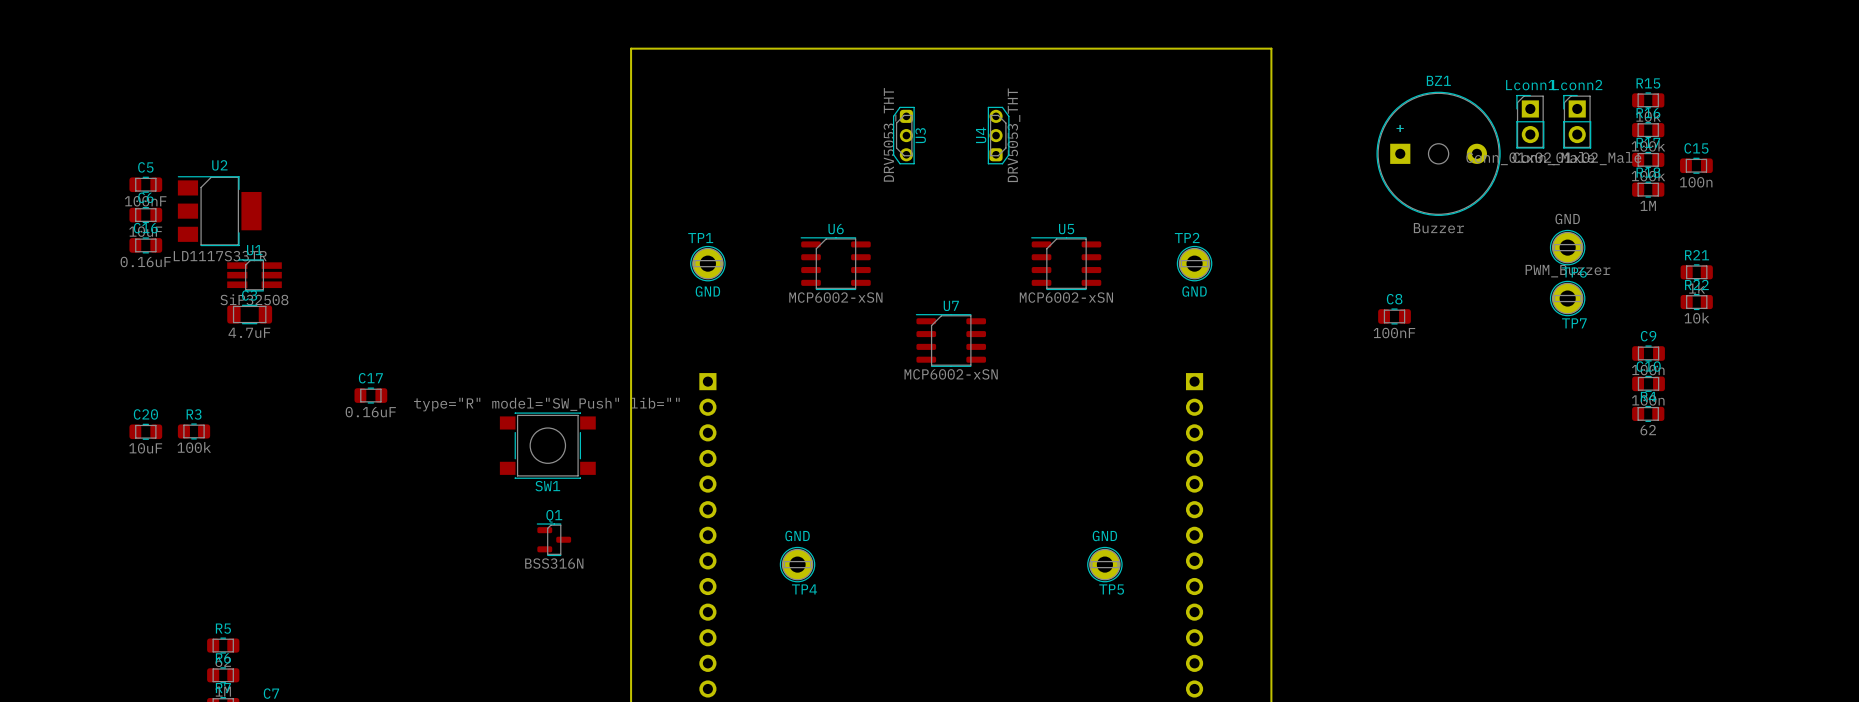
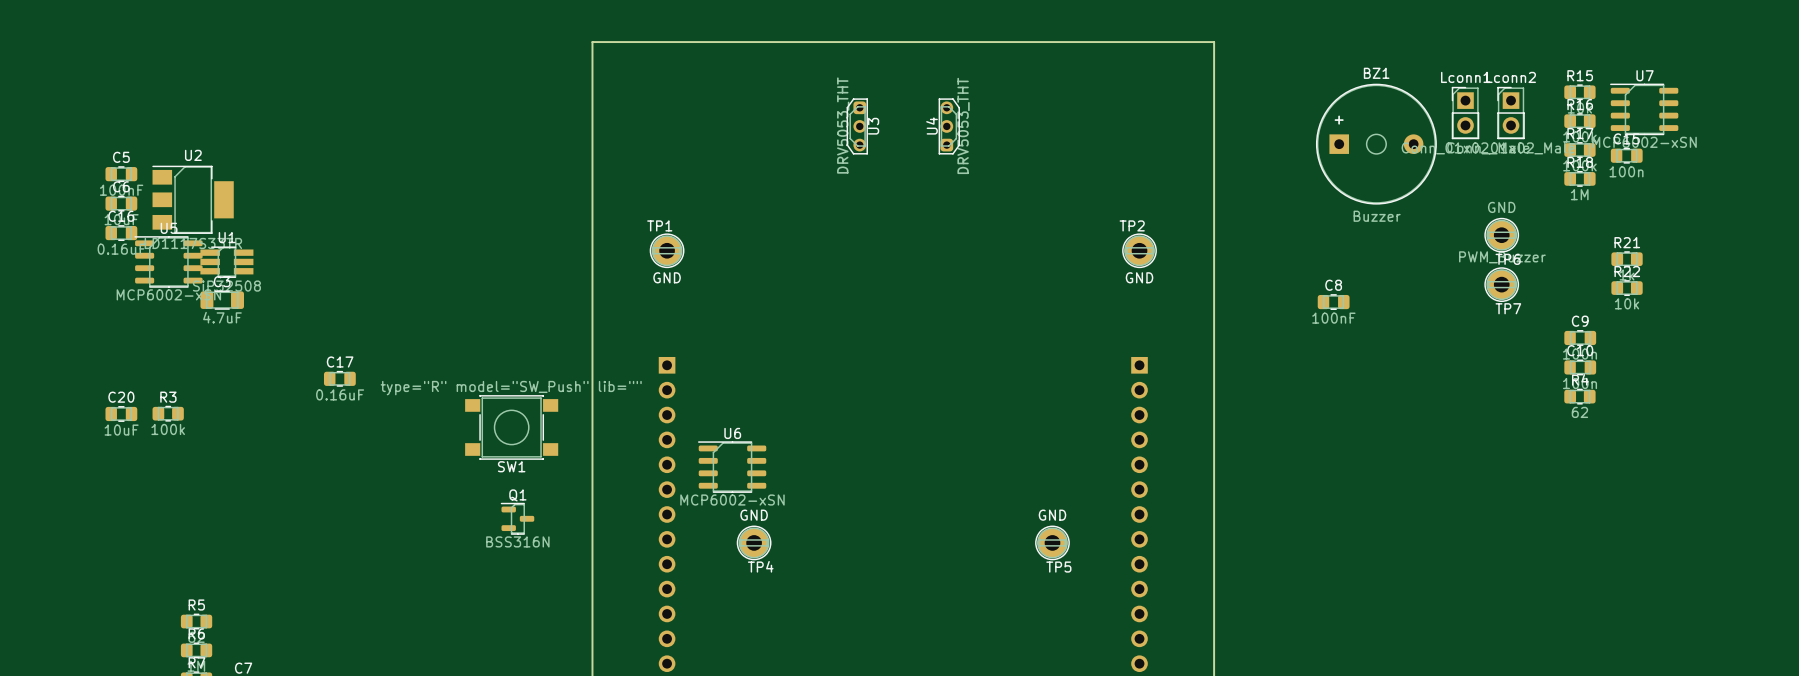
U6 position: (835, 263) -> (732, 467)
U5 position: (1066, 263) -> (168, 261)
U7 position: (950, 340) -> (1644, 109)

